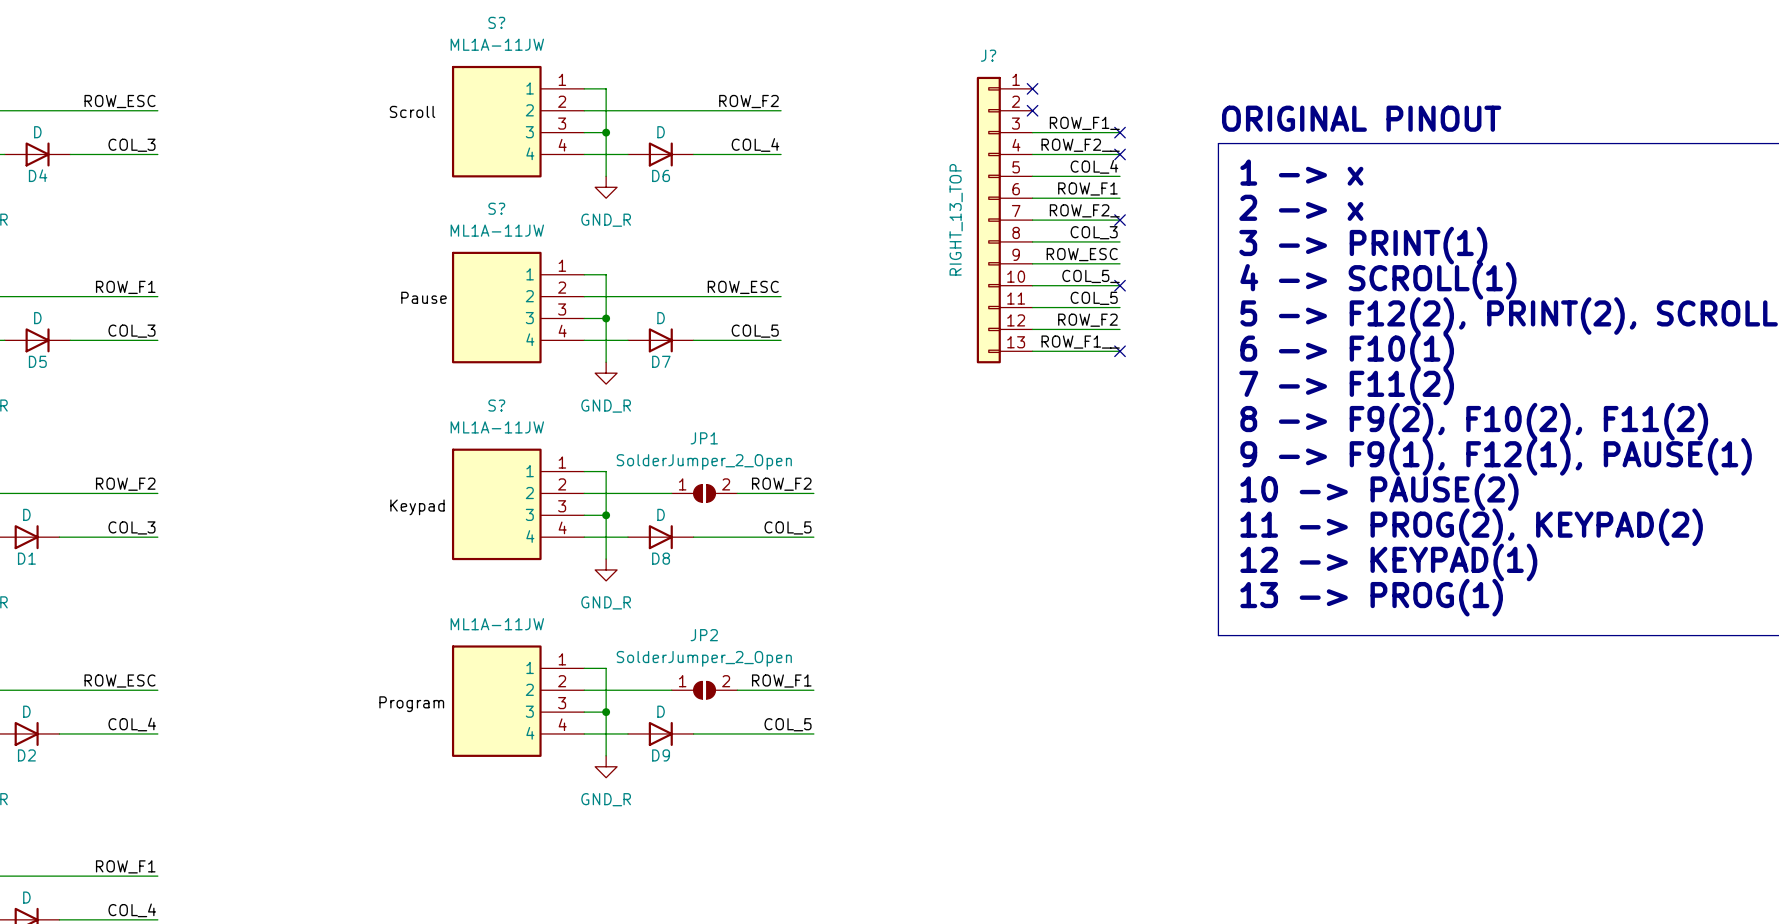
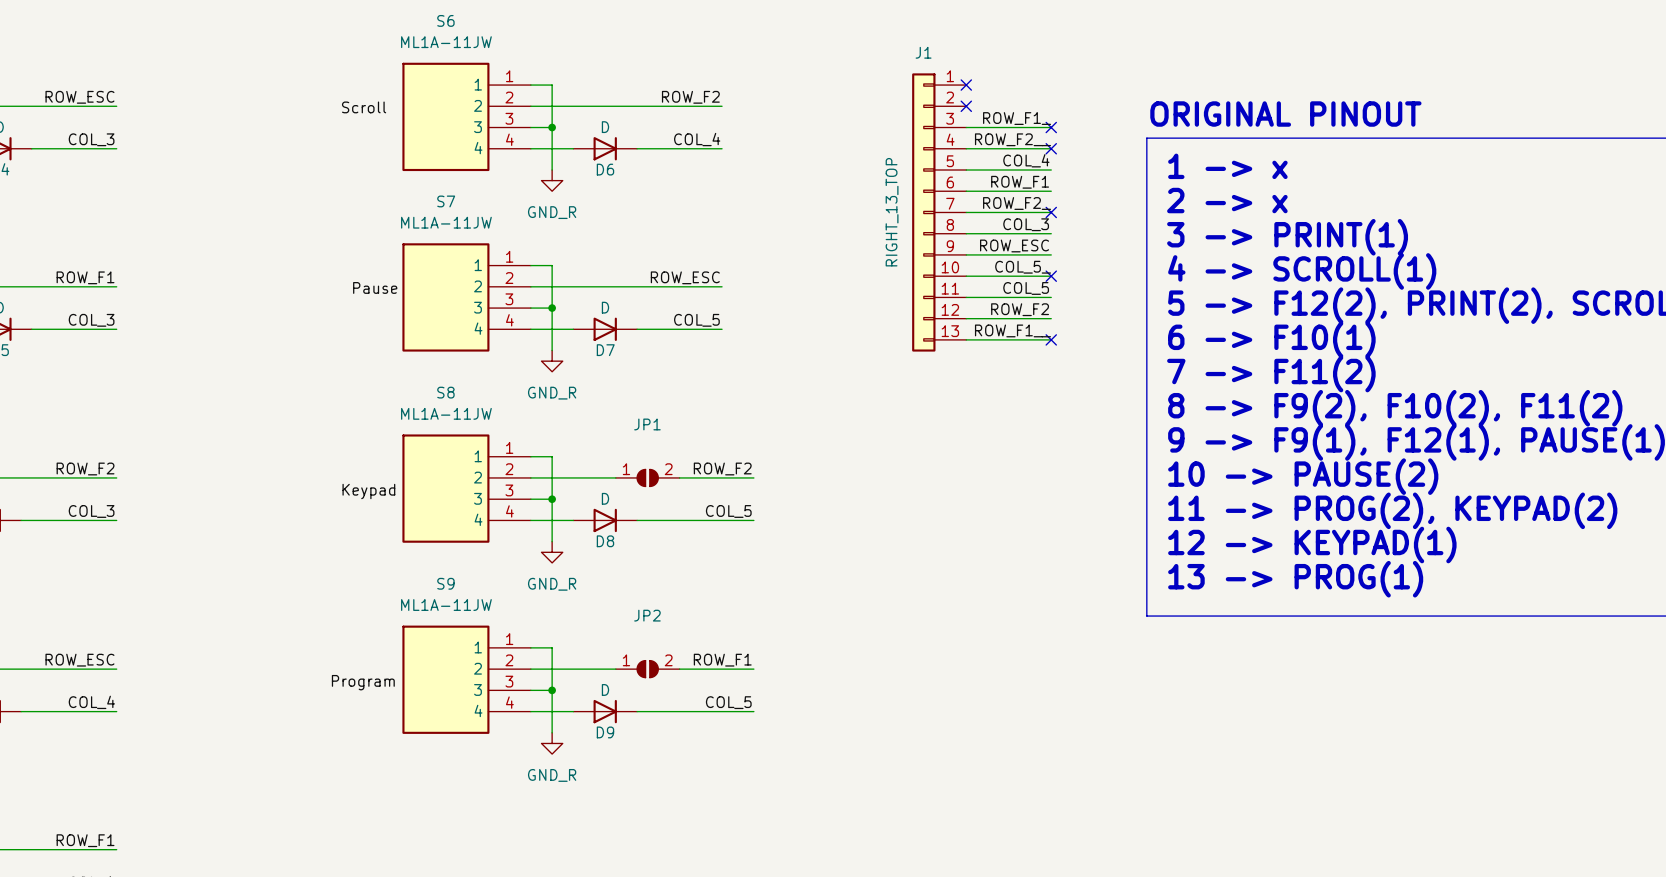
S? name: S? (496, 22) -> S6 (445, 20)
J? name: J? (988, 55) -> J1 (923, 52)
S? name: S? (496, 208) -> S7 (446, 201)
S? name: S? (496, 405) -> S8 (445, 392)
JP1 value: SolderJumper_2_Open (704, 462) -> none
S9 name: none -> S9 (445, 583)
JP2 value: SolderJumper_2_Open (704, 658) -> none

